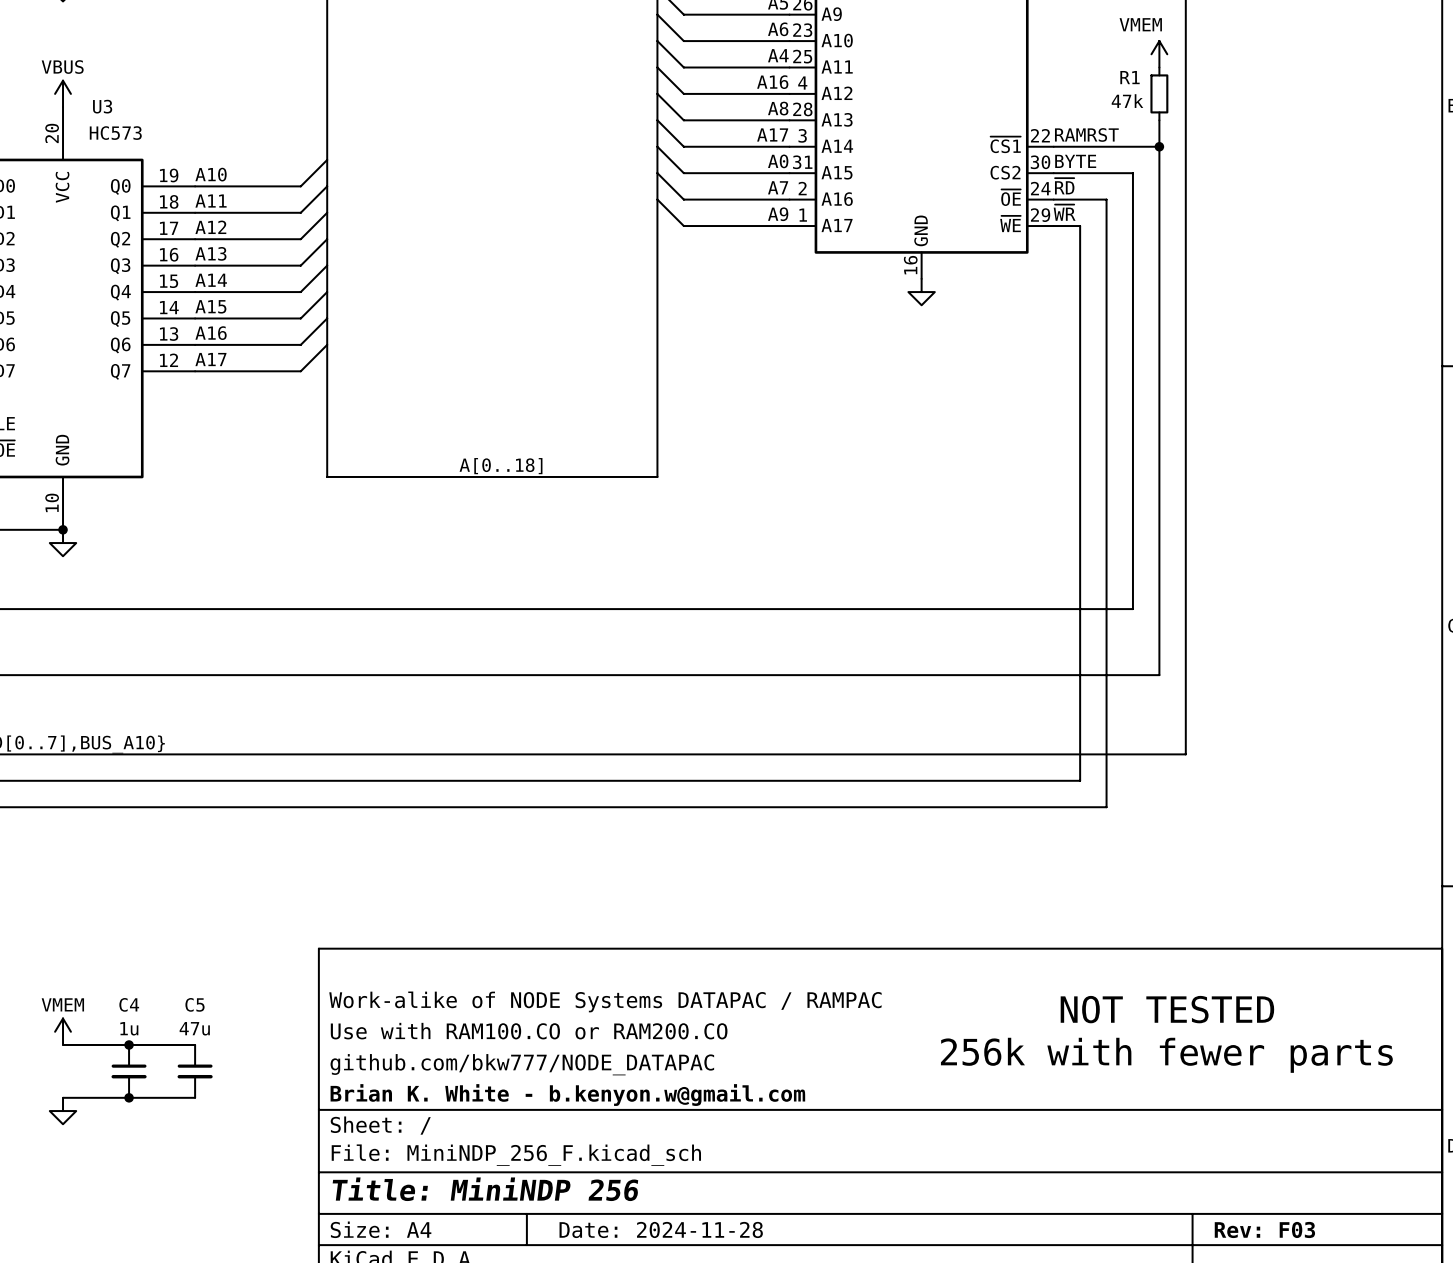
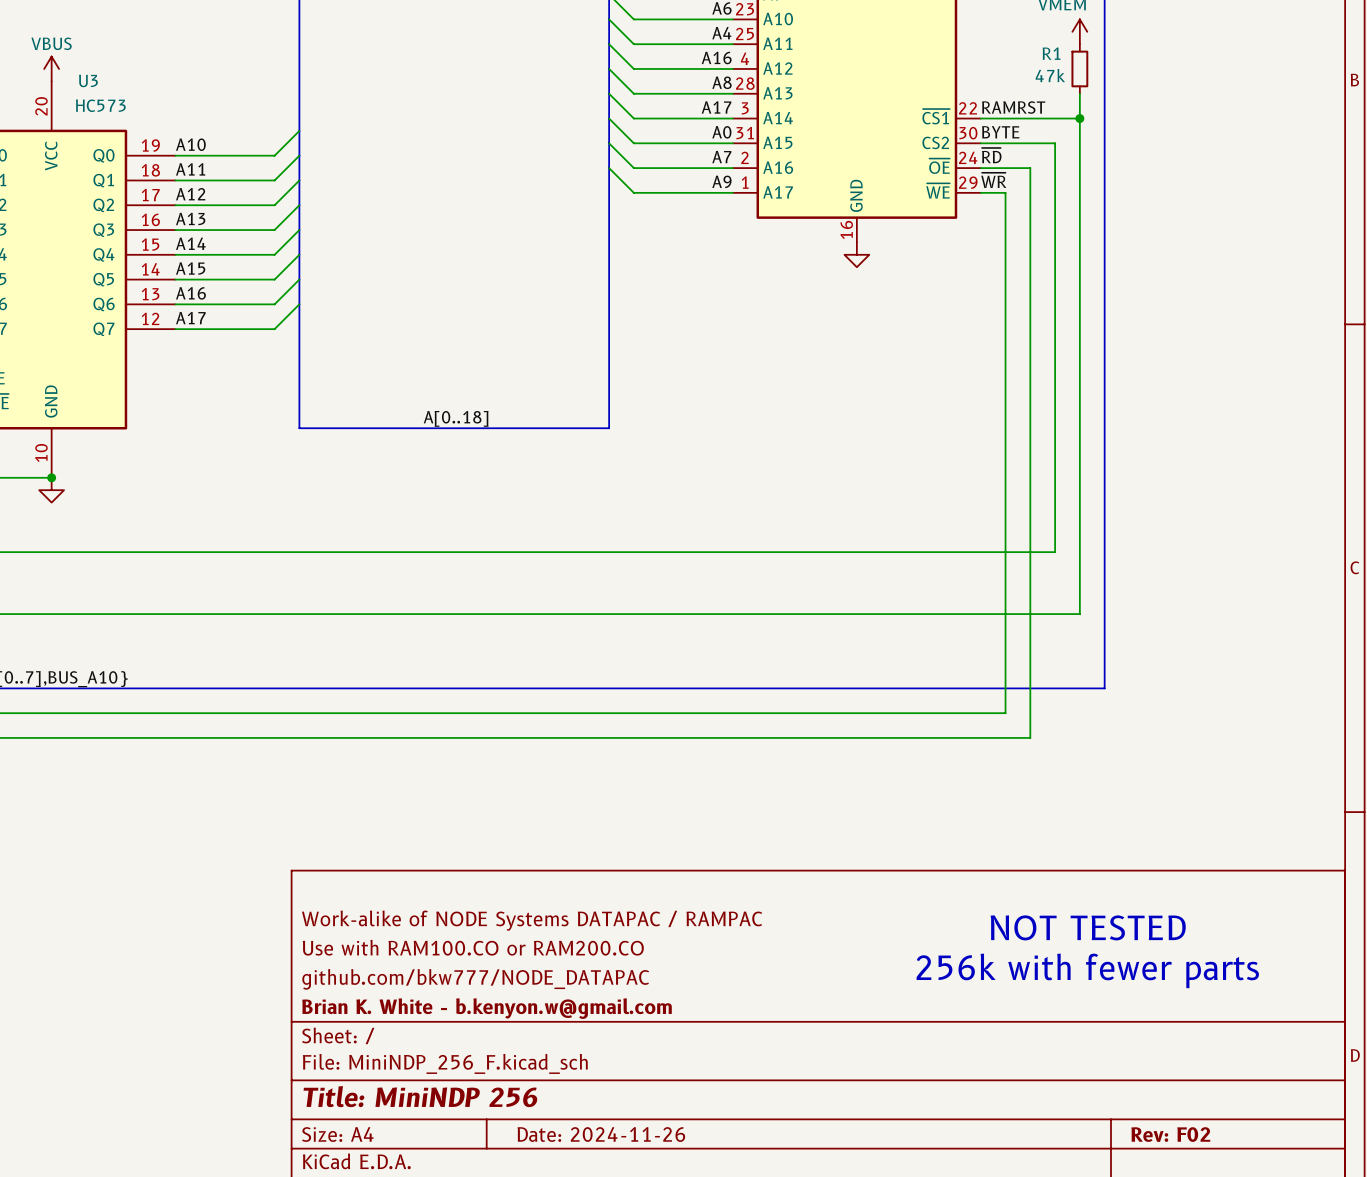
power symbol: VMEM (63, 1031) -> none
wire: (63, 1044) (195, 1044) -> none
junction: (129, 1044) -> none
C4: 1u (129, 1071) -> none
C5: 47u (195, 1071) -> none
wire: (63, 1097) (195, 1097) -> none
junction: (129, 1097) -> none
power symbol: (63, 1111) -> none
title block: Date: 2024-11-28 (661, 1229) -> Date: 2024-11-26 (601, 1134)
title block: Rev: F03 (1264, 1229) -> Rev: F02 (1170, 1134)

